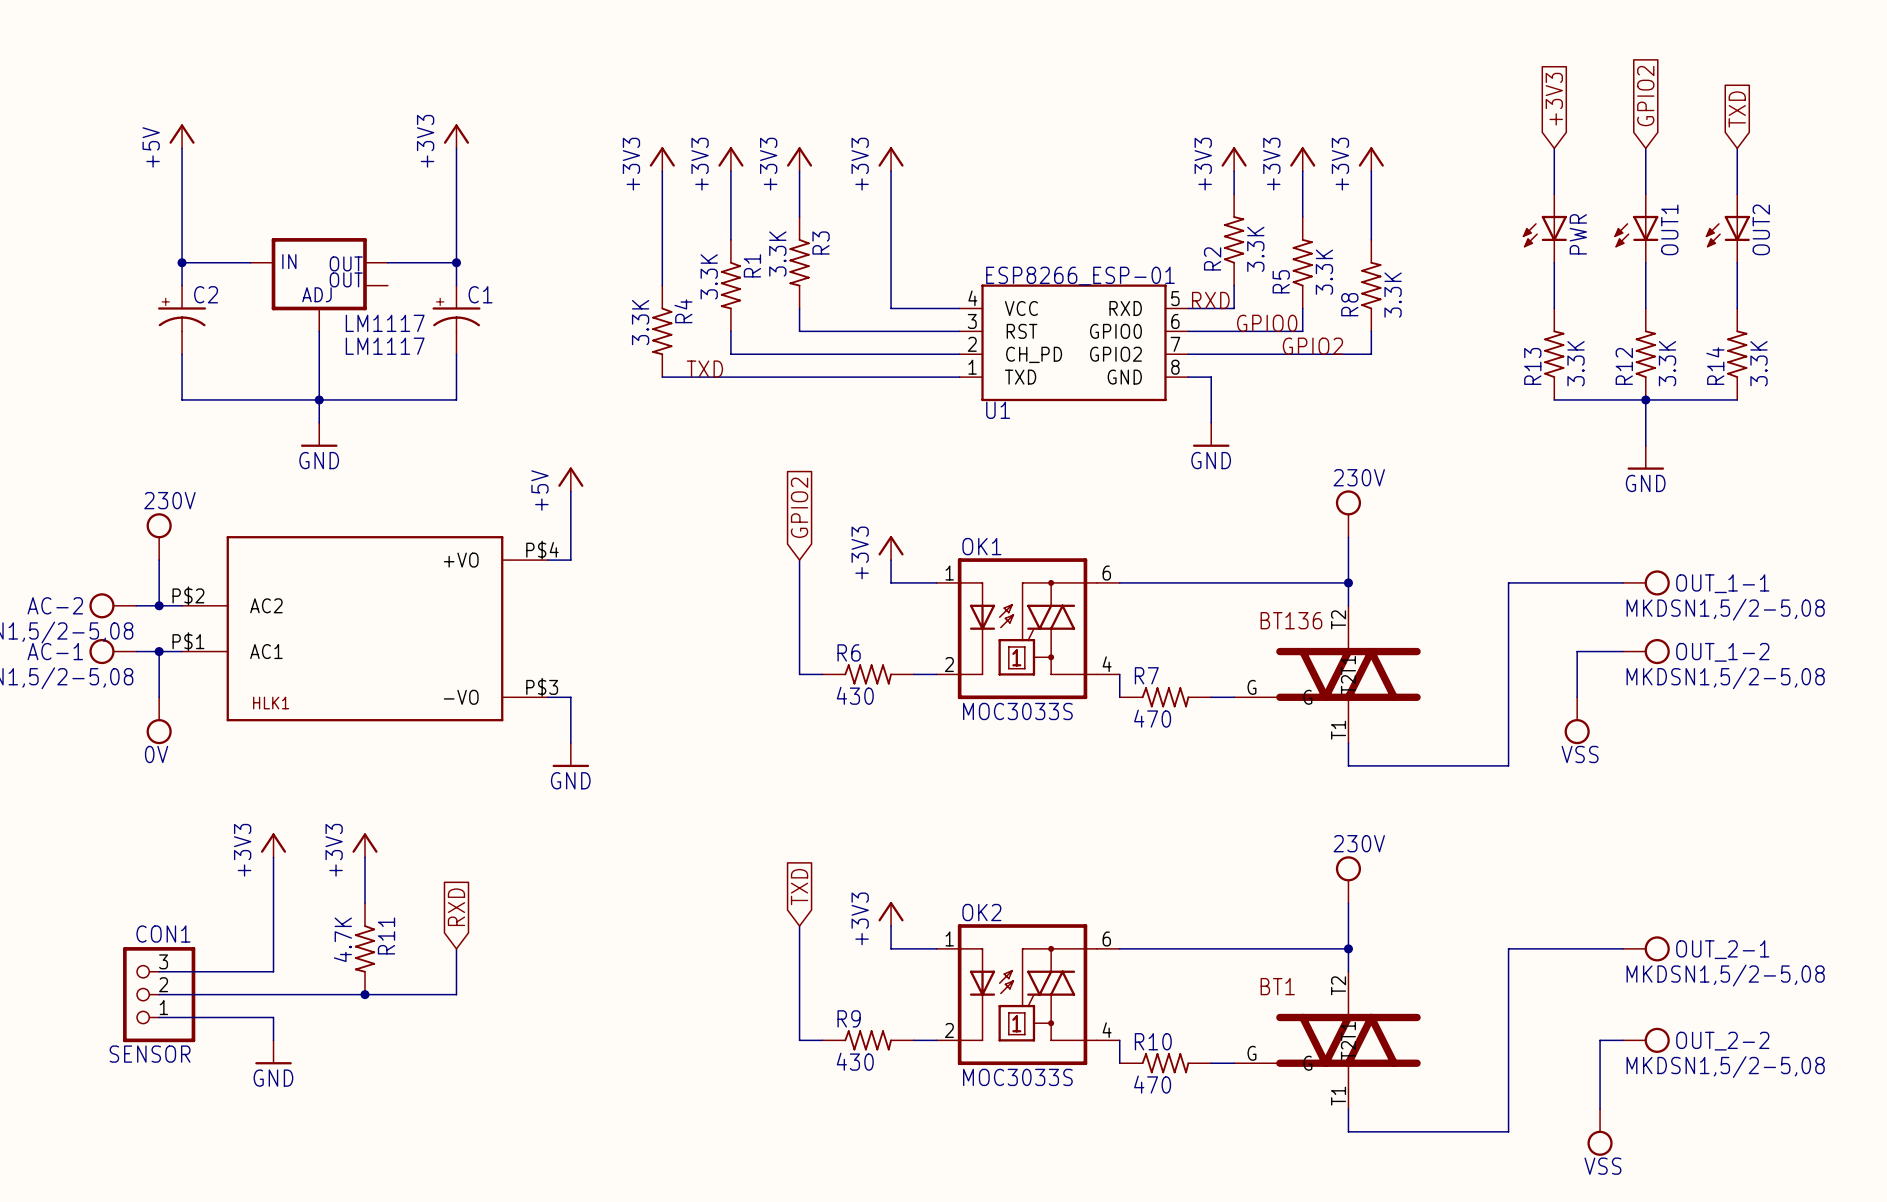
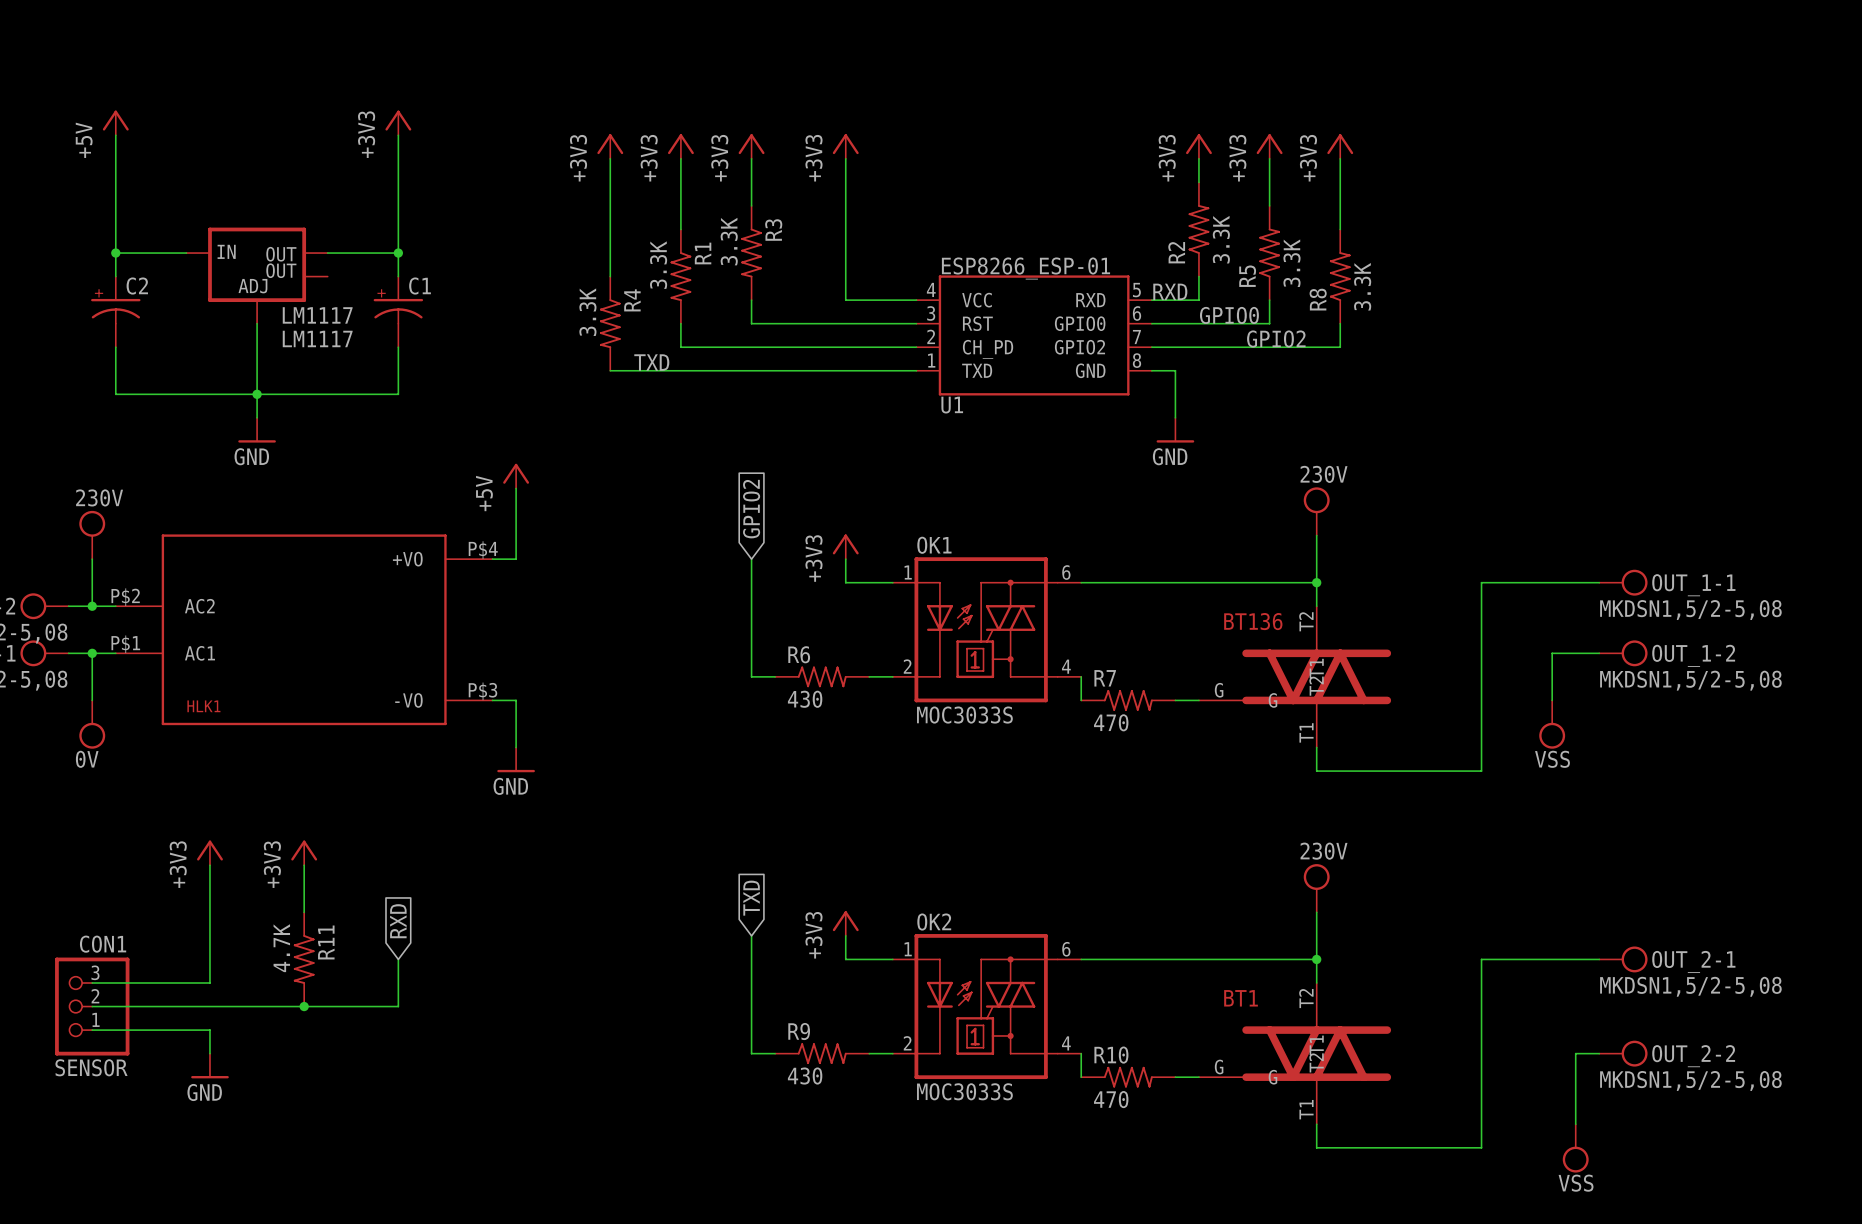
global label: GPIO2 (1645, 96) -> none
global label: +3V3 (1554, 99) -> none
global label: TXD (1737, 109) -> none
wire: (1554, 148) (1554, 194) -> none
wire: (1645, 148) (1645, 194) -> none
wire: (1737, 148) (1737, 194) -> none
PWR: (1544, 228) -> none
OUT1: (1636, 228) -> none
OUT2: (1727, 228) -> none
wire: (1554, 262) (1554, 308) -> none
wire: (1645, 262) (1645, 308) -> none
wire: (1737, 262) (1737, 308) -> none
R13: 3.3K (1554, 354) -> none
R12: 3.3K (1645, 354) -> none
R14: 3.3K (1737, 354) -> none
wire: (1554, 399) (1737, 399) -> none
wire: (1645, 399) (1645, 445) -> none
junction: (1645, 399) -> none
power symbol: GND (1645, 457) -> none

